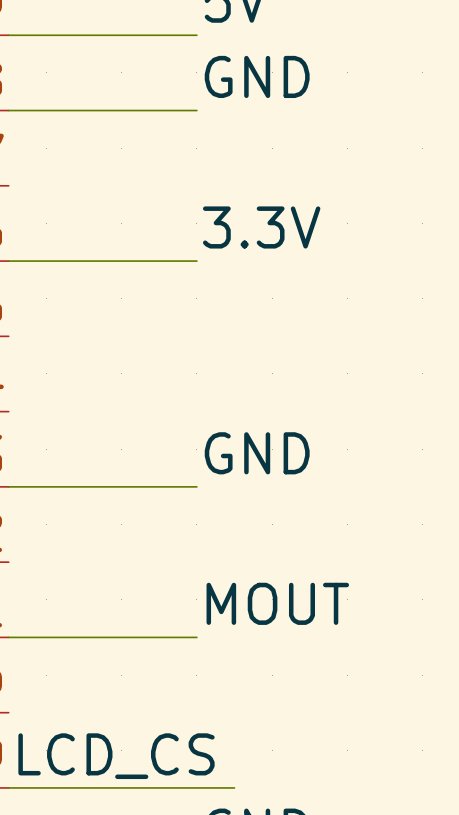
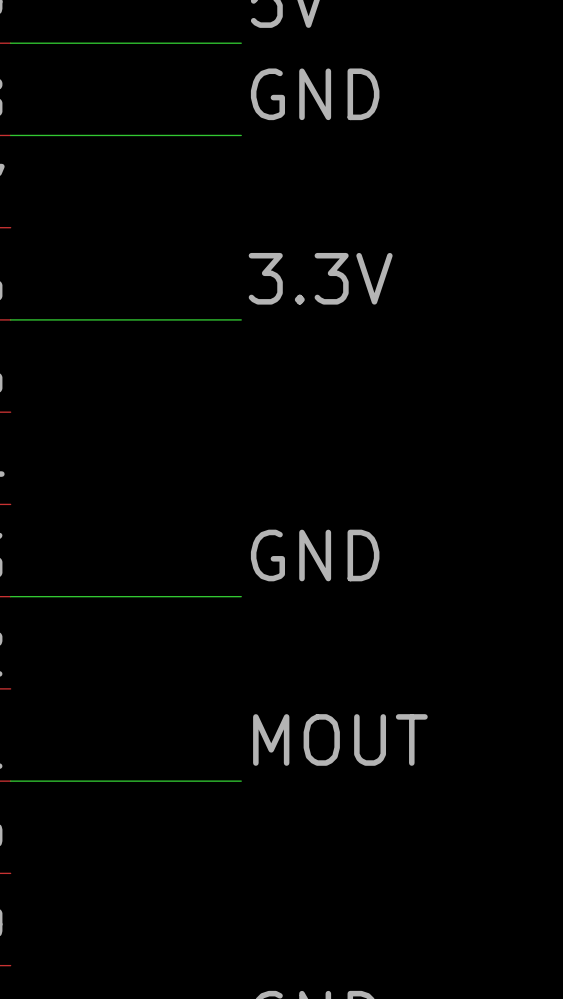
label: LCD_CS (116, 756) -> none
wire: (8, 787) (234, 787) -> none

